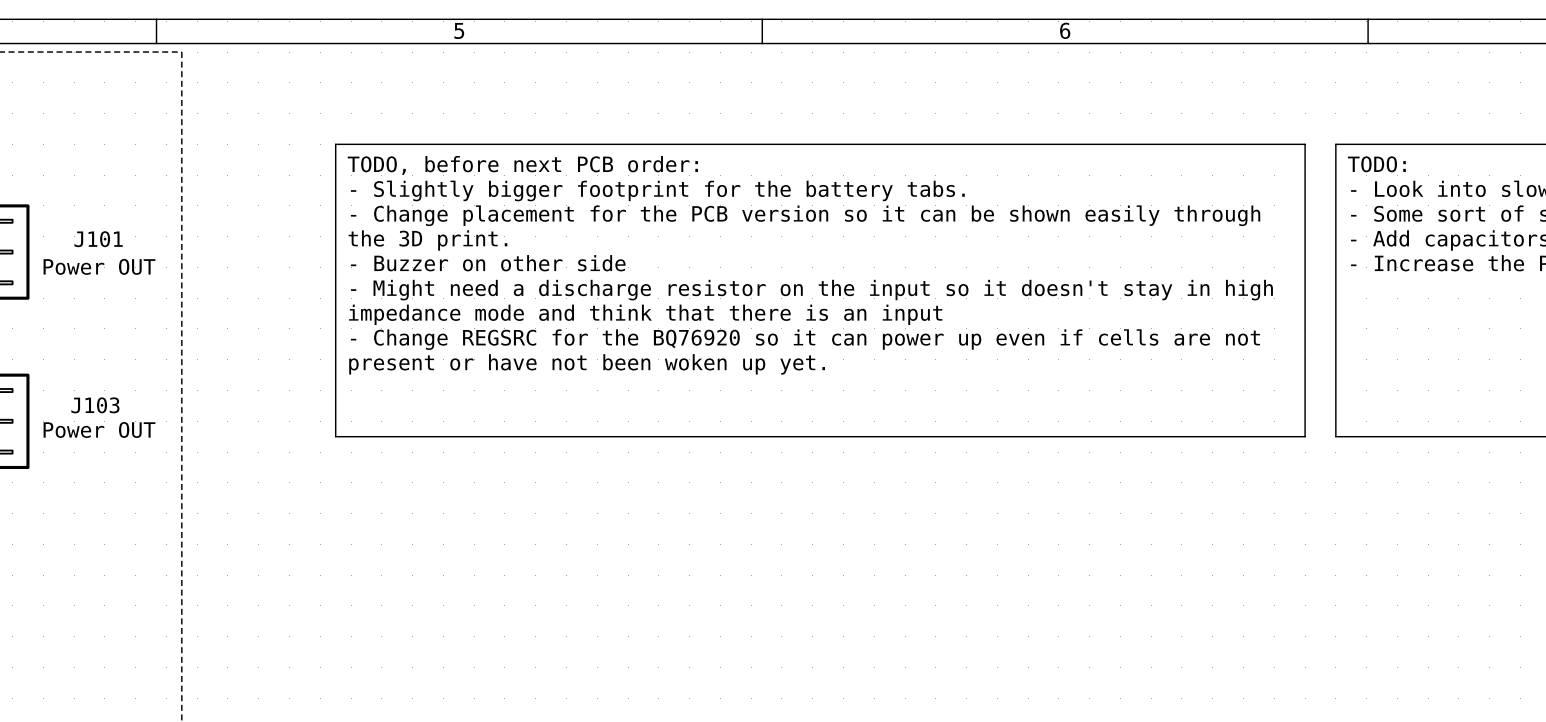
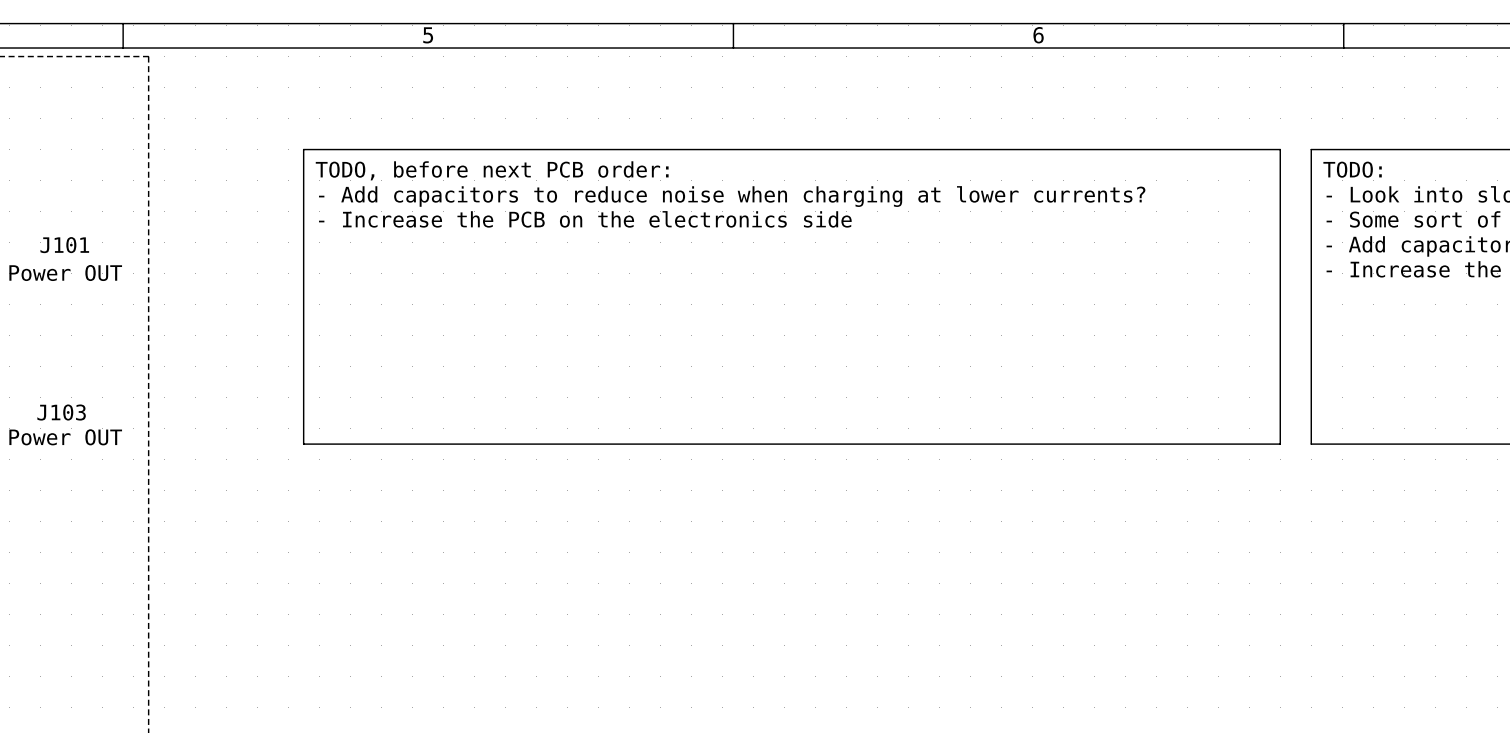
text: - Slightly bigger footprint for the battery tabs. (657, 190) -> - Add capacitors to reduce noise when charging at lower currents? (732, 196)
text: - Change placement for the PCB version so it can be shown easily through (805, 215) -> - Increase the PCB on the electronics side (585, 219)
text: the 3D print. (427, 240) -> none
text: - Buzzer on other side (488, 263) -> none
text: - Might need a discharge resistor on the input so it doesn't stay in high (811, 290) -> none
text: impedance mode and think that there is an input (645, 314) -> none
text: - Change REGSRC for the BQ76920 so it can power up even if cells are not (805, 339) -> none
text: present or have not been woken up yet. (587, 364) -> none

